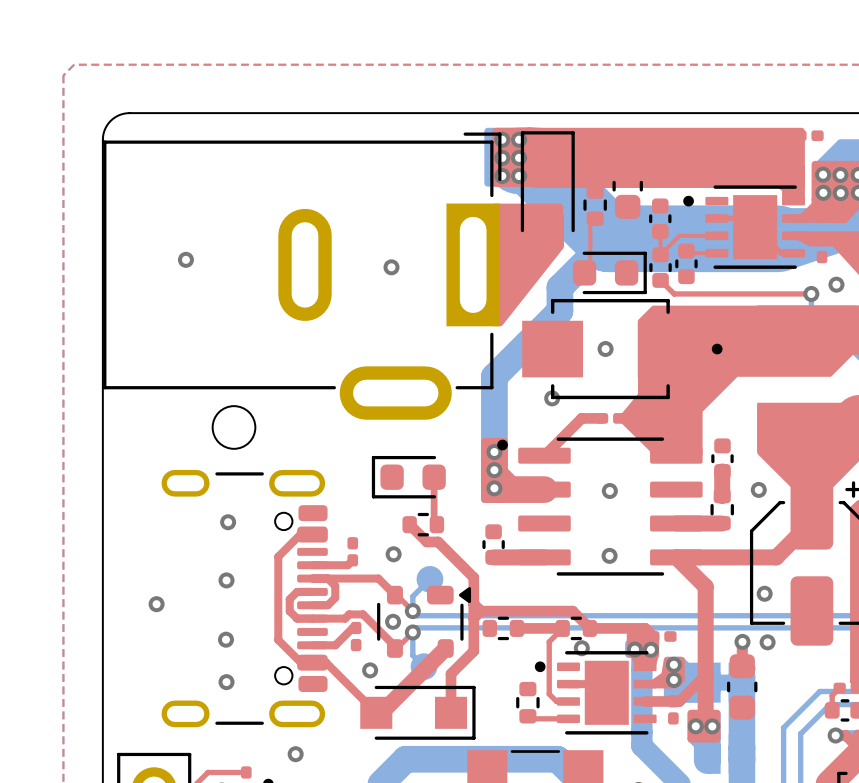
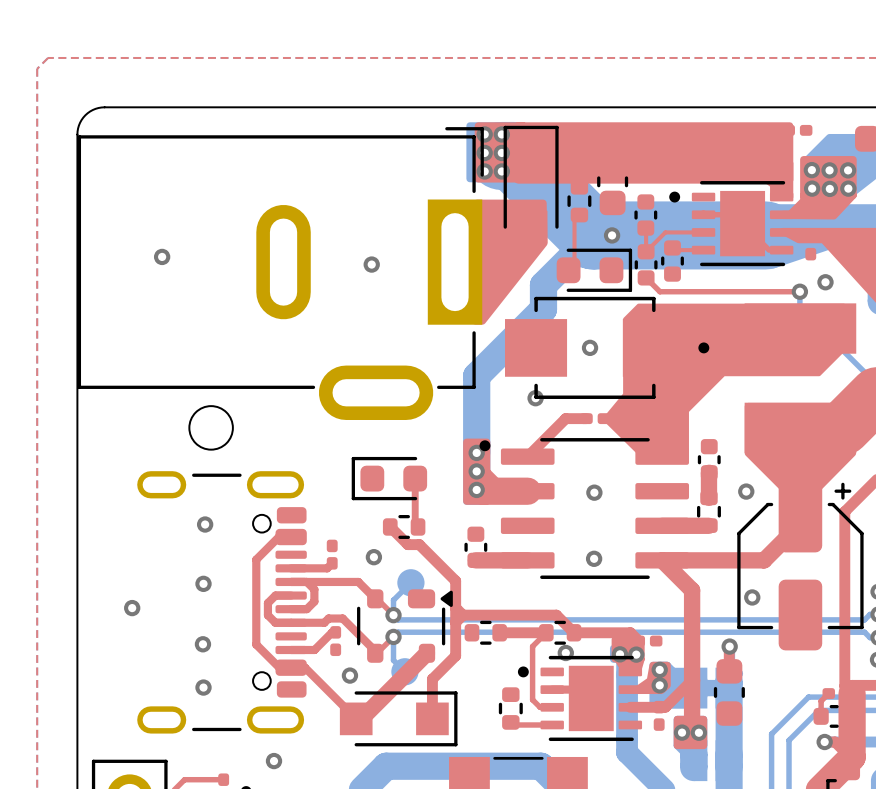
via: none -> (612, 235)
via: (393, 621) -> none
via: (767, 642) -> none

